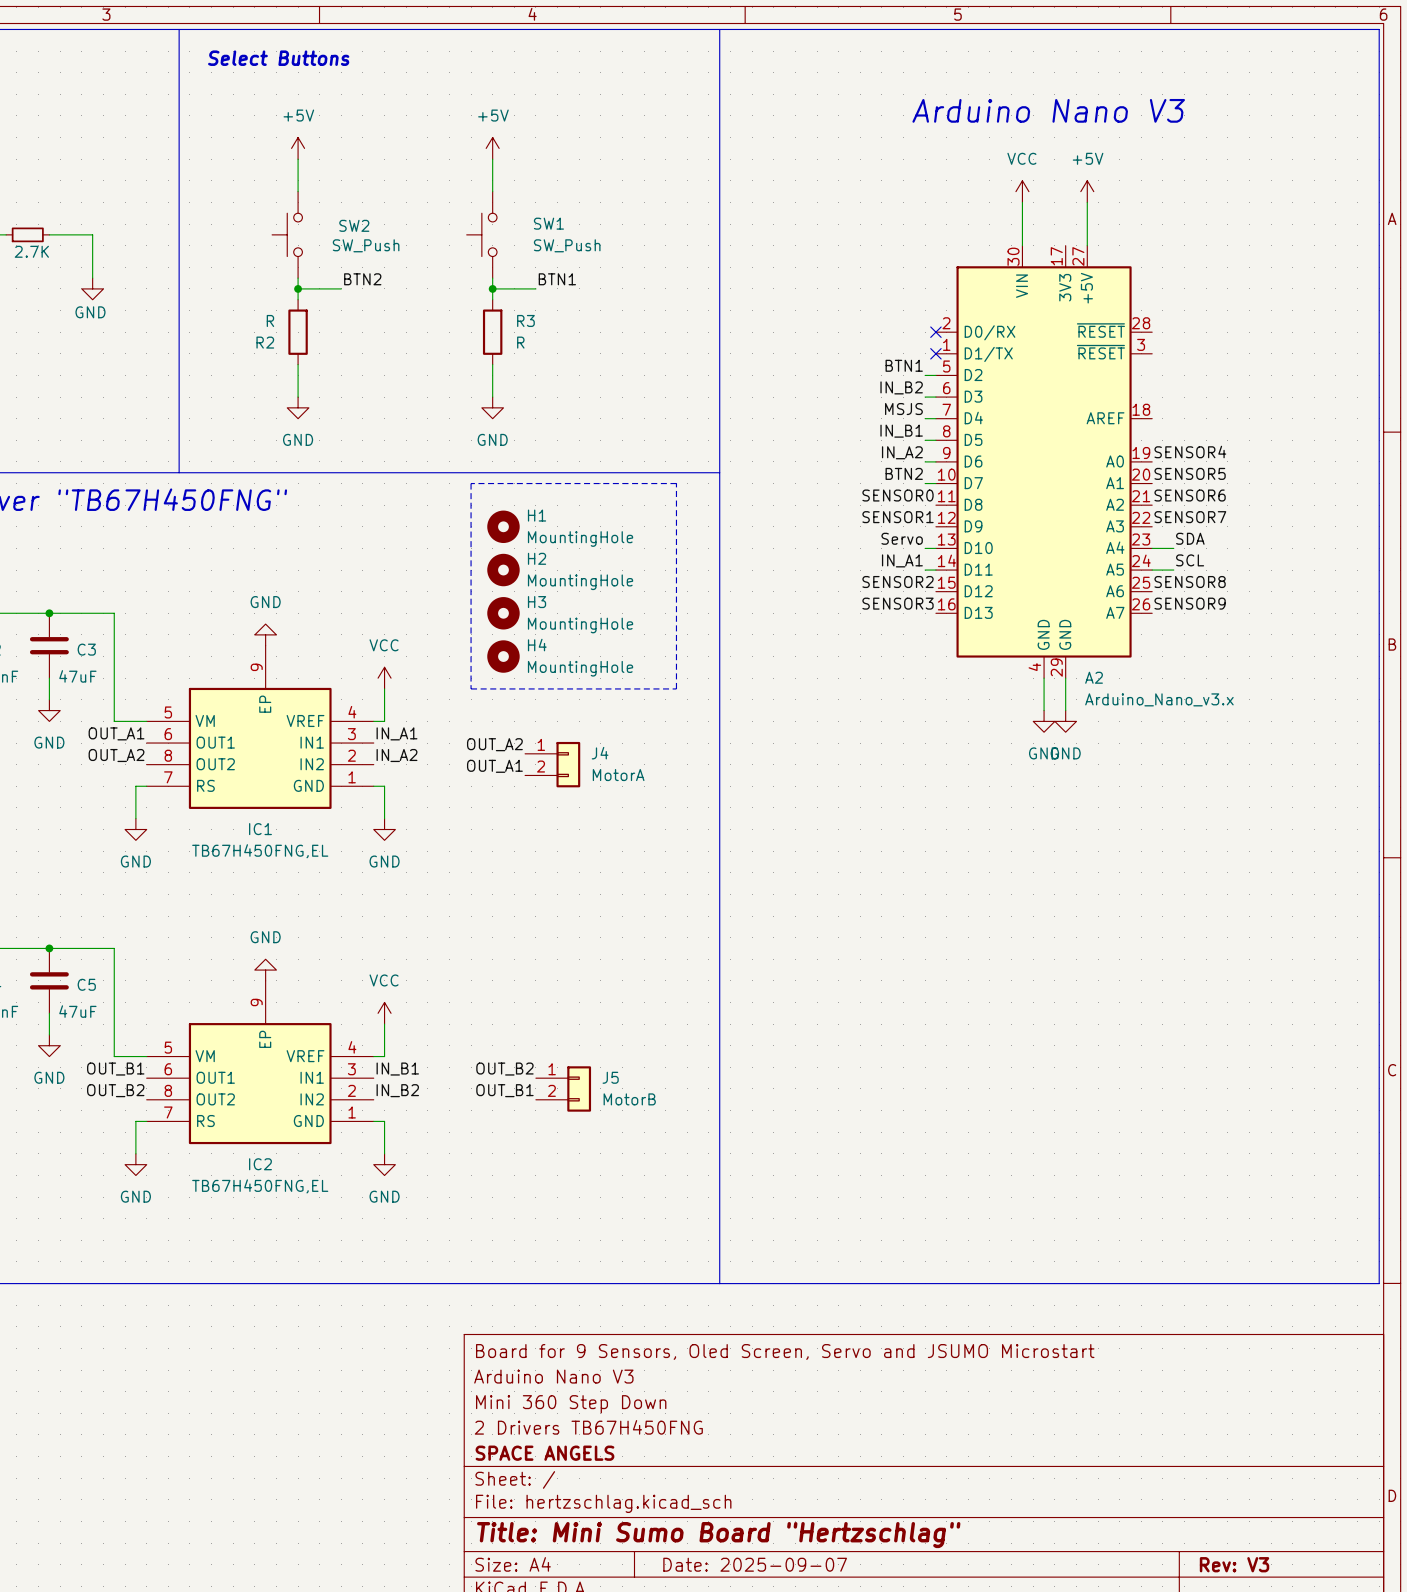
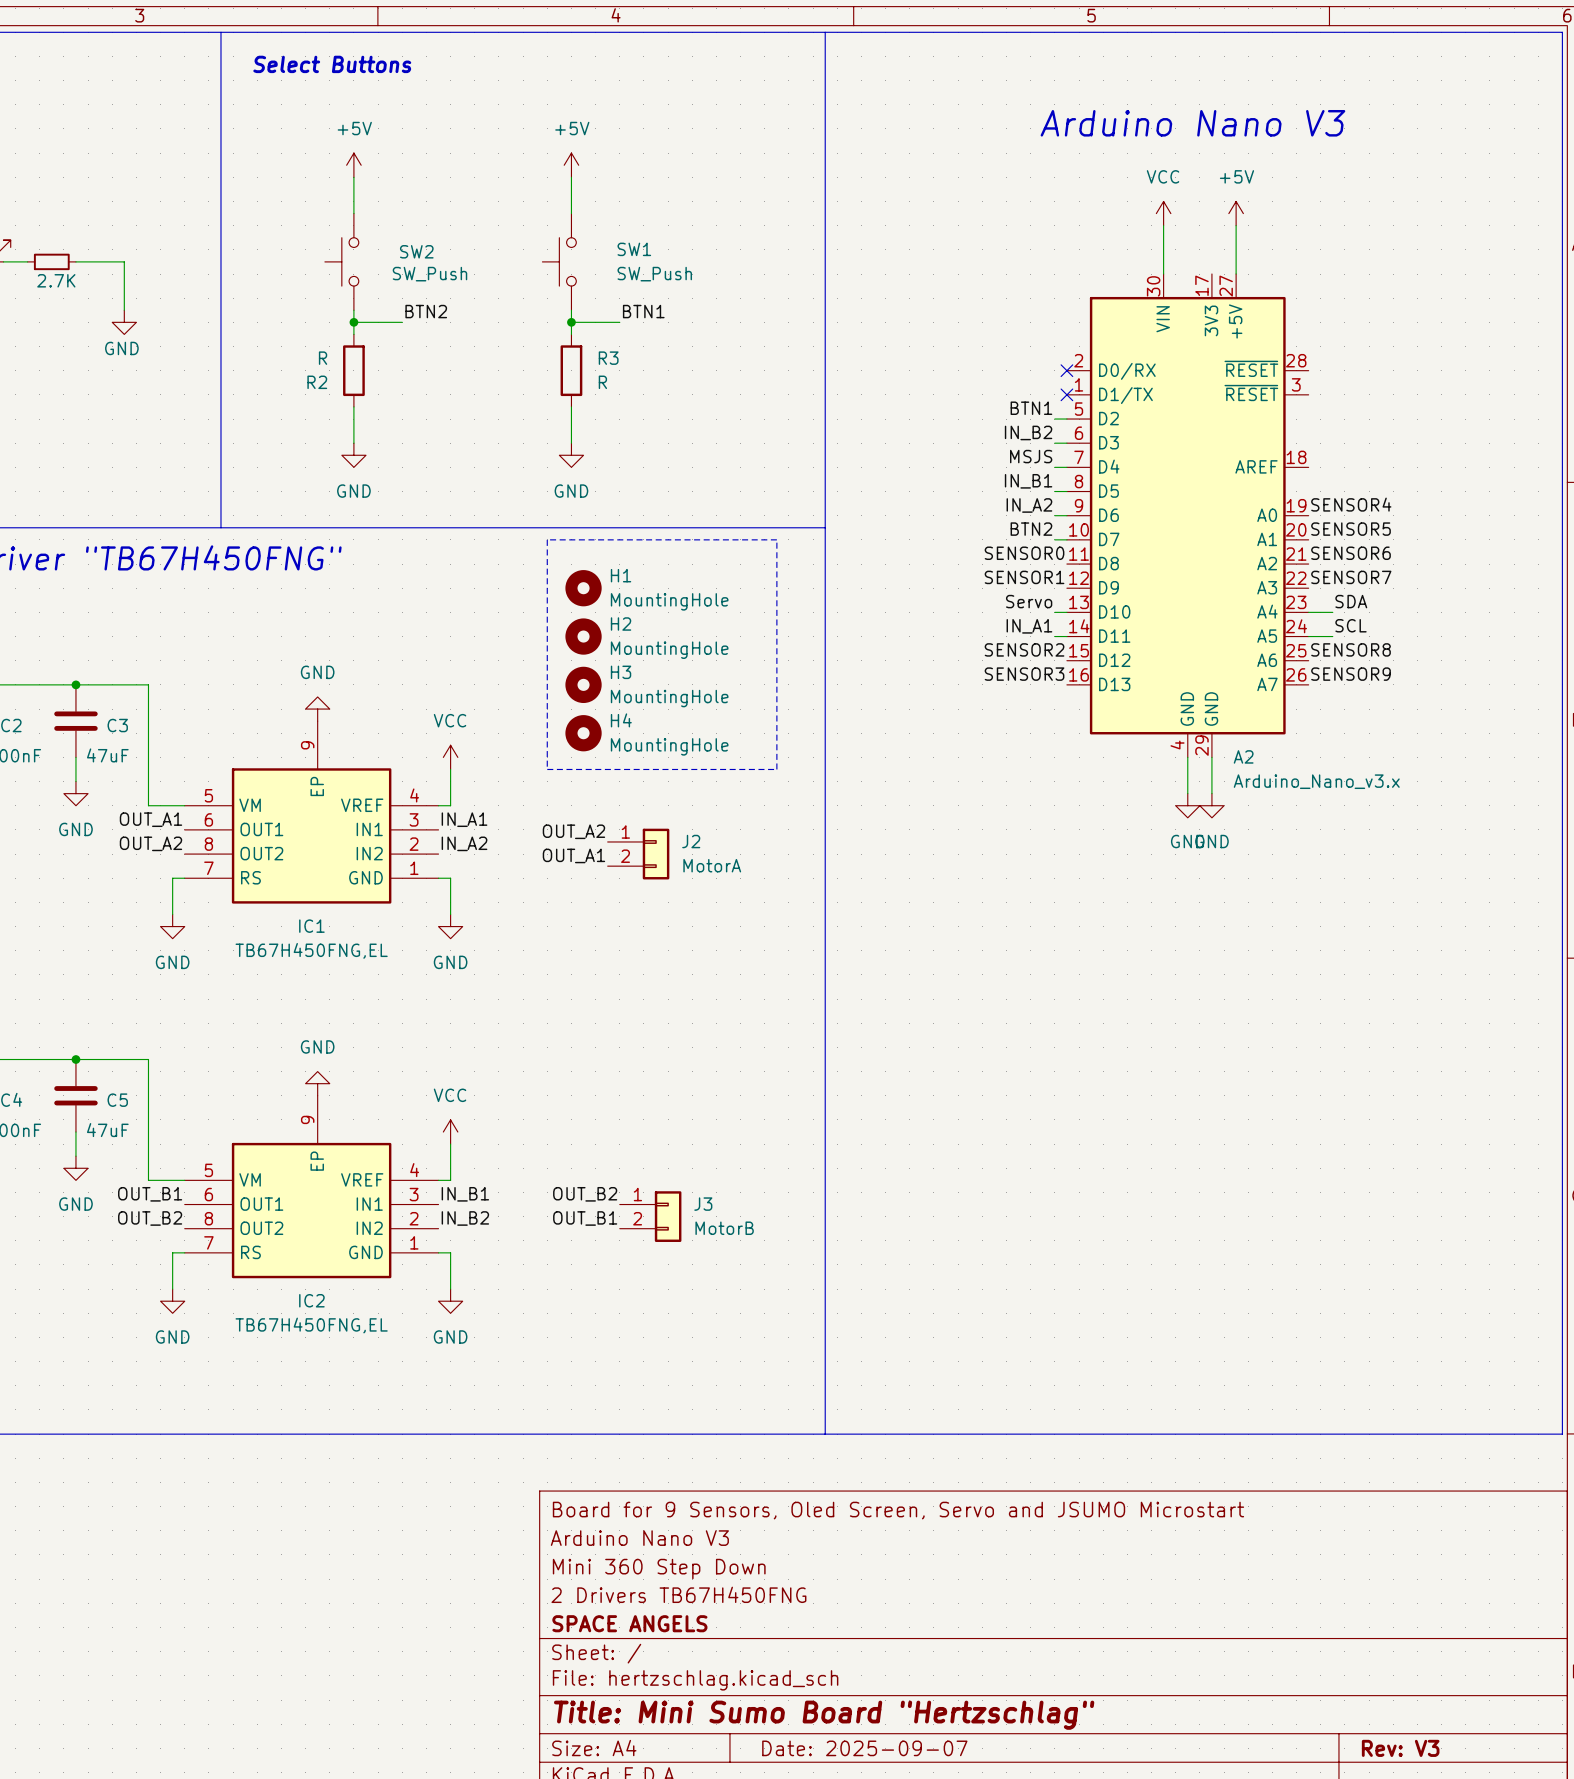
J4 name: J4 (600, 753) -> J2 (691, 841)
J5 name: J5 (610, 1077) -> J3 (703, 1204)

